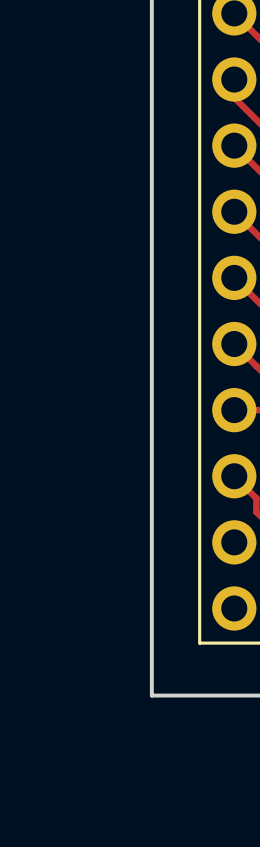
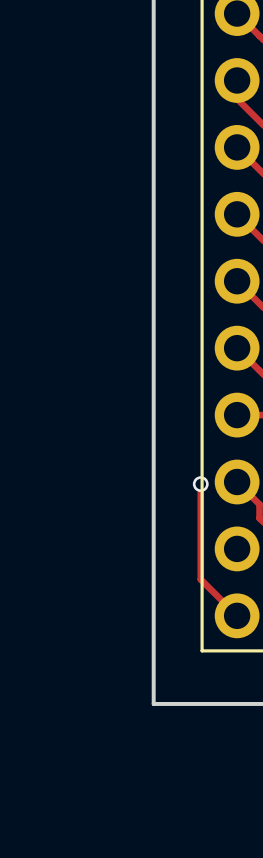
track: none -> (200, 484) (200, 579) (237, 615)
via: none -> (200, 484)

